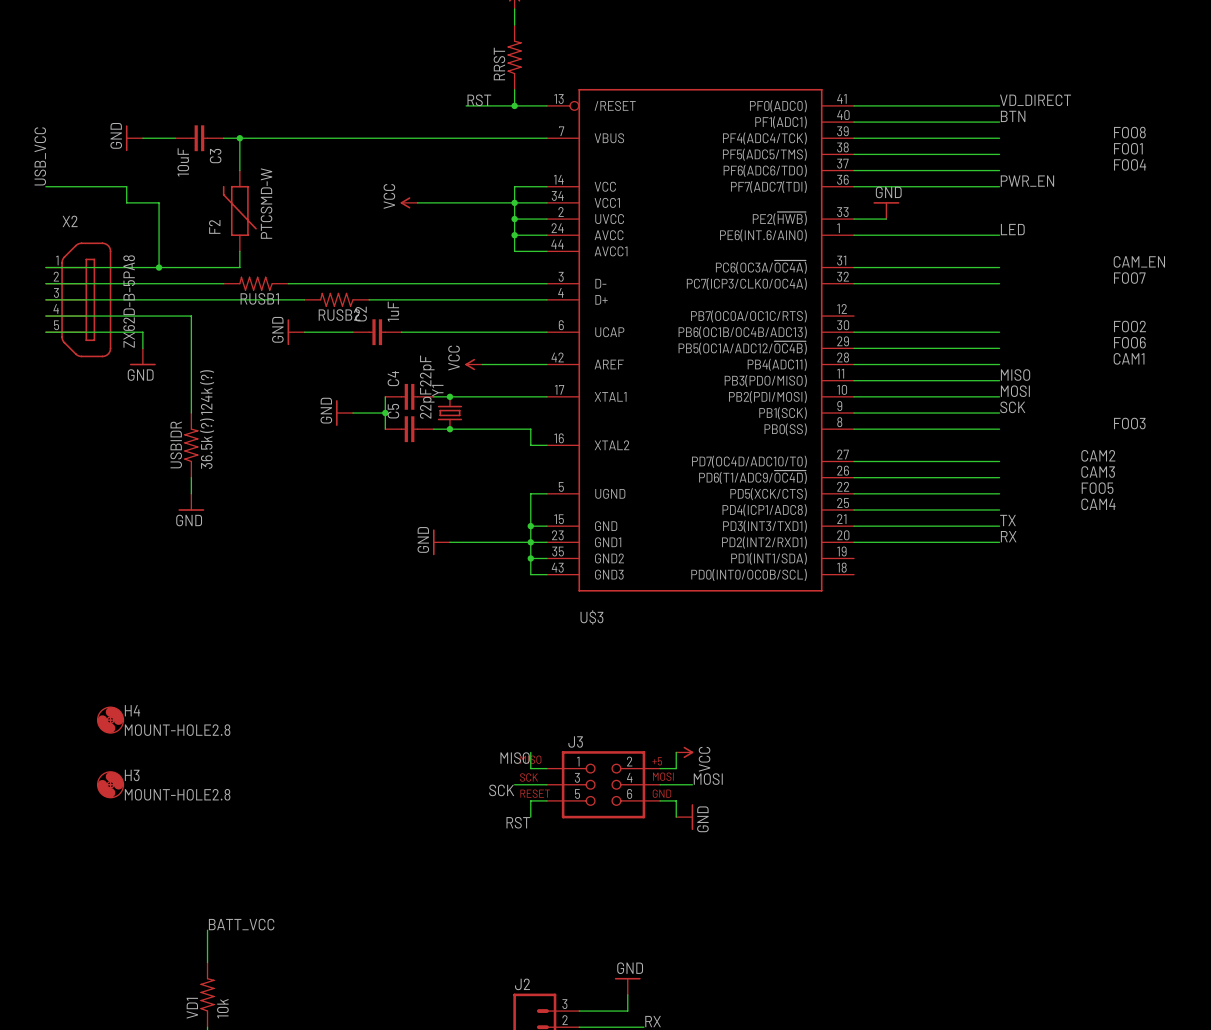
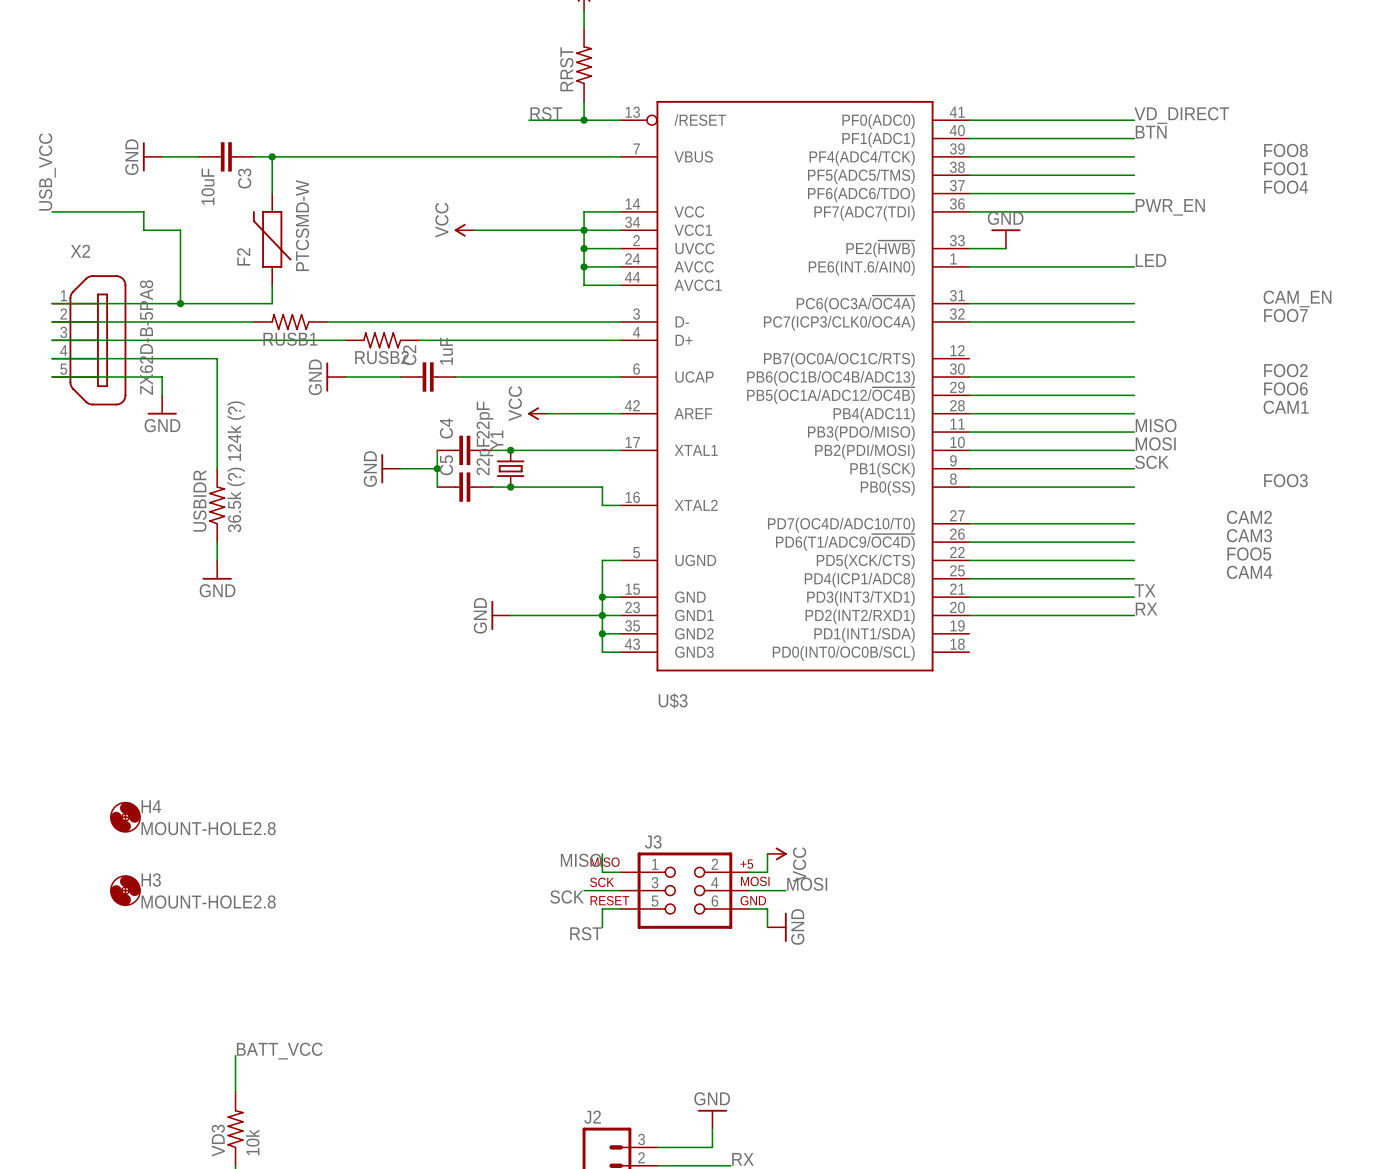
VD1 name: VD1 (192, 1008) -> VD3 (218, 1140)

